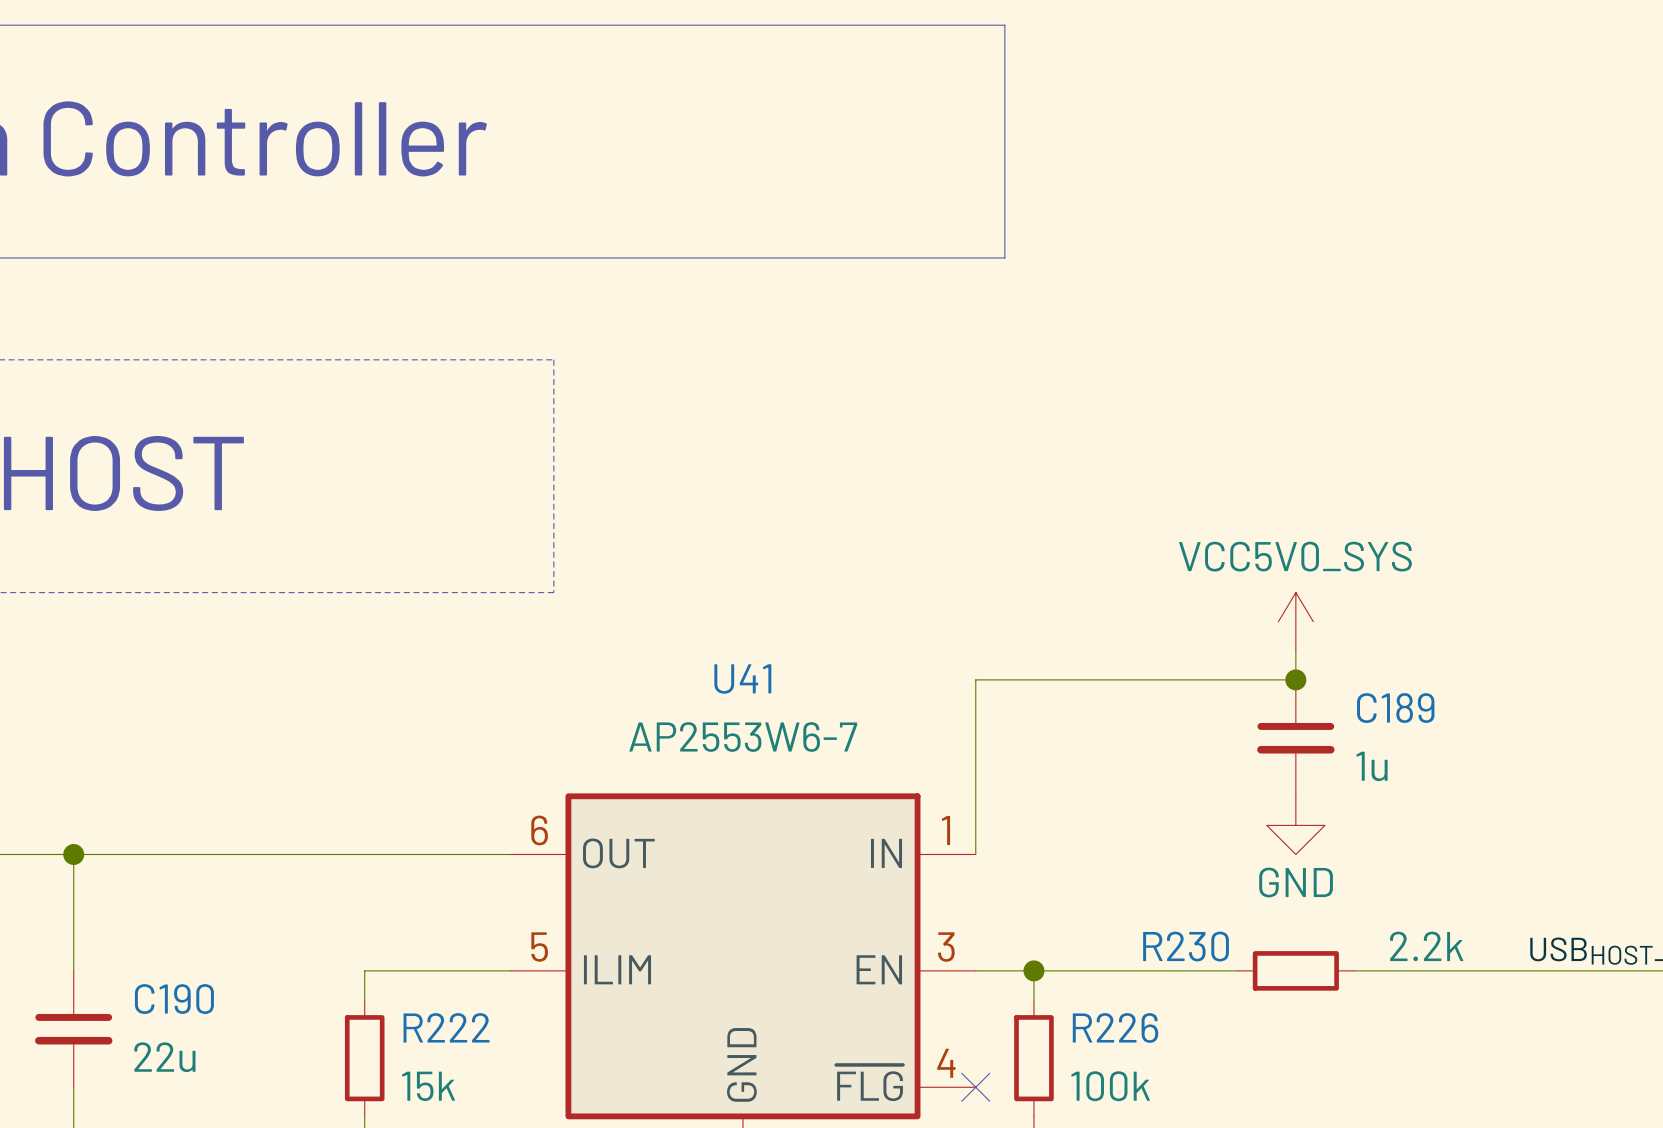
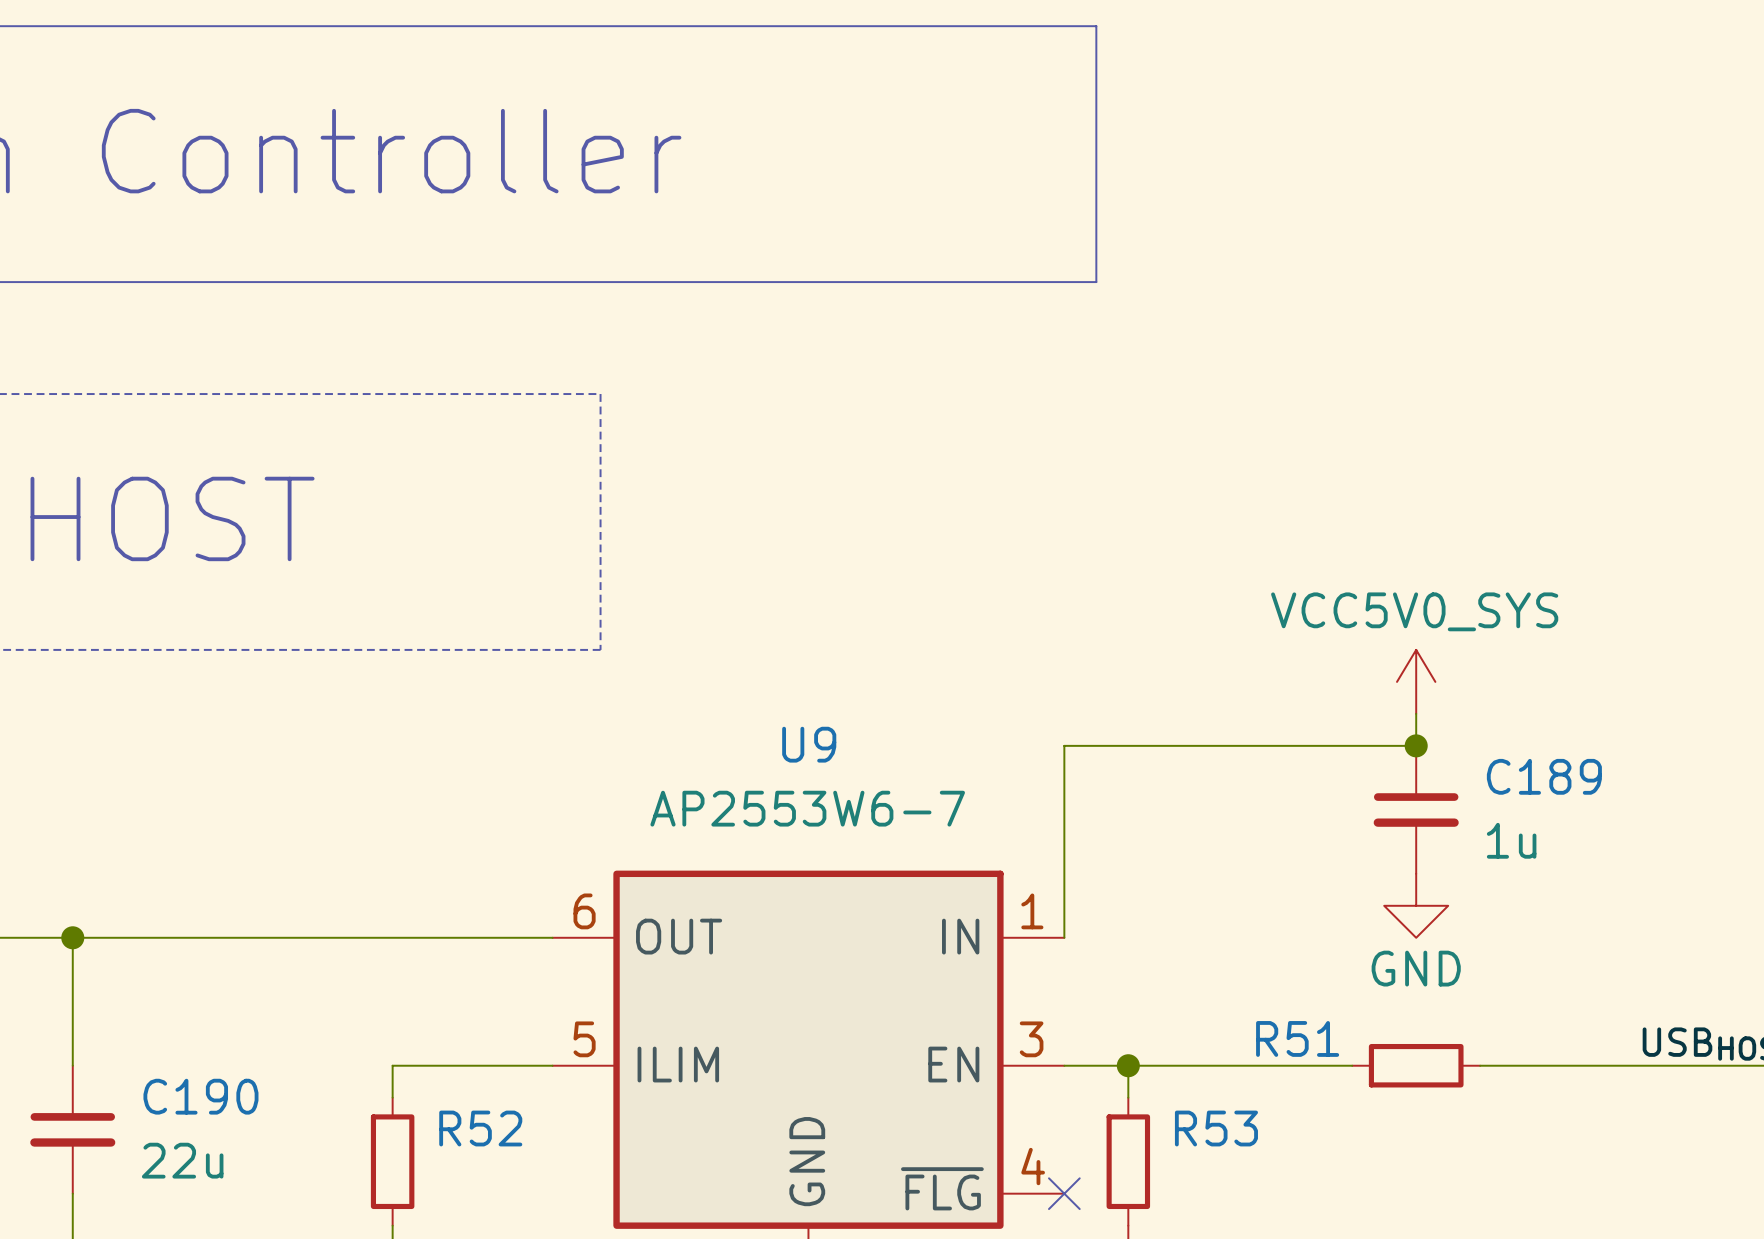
U41 name: U41 (742, 678) -> U9 (809, 744)
R230 name: R230 (1186, 946) -> R51 (1297, 1038)
R230 value: 2.2k (1426, 946) -> none
R222 name: R222 (446, 1027) -> R52 (480, 1128)
R226 name: R226 (1115, 1027) -> R53 (1216, 1128)
R222 value: 15k (428, 1086) -> none
R226 value: 100k (1110, 1086) -> none

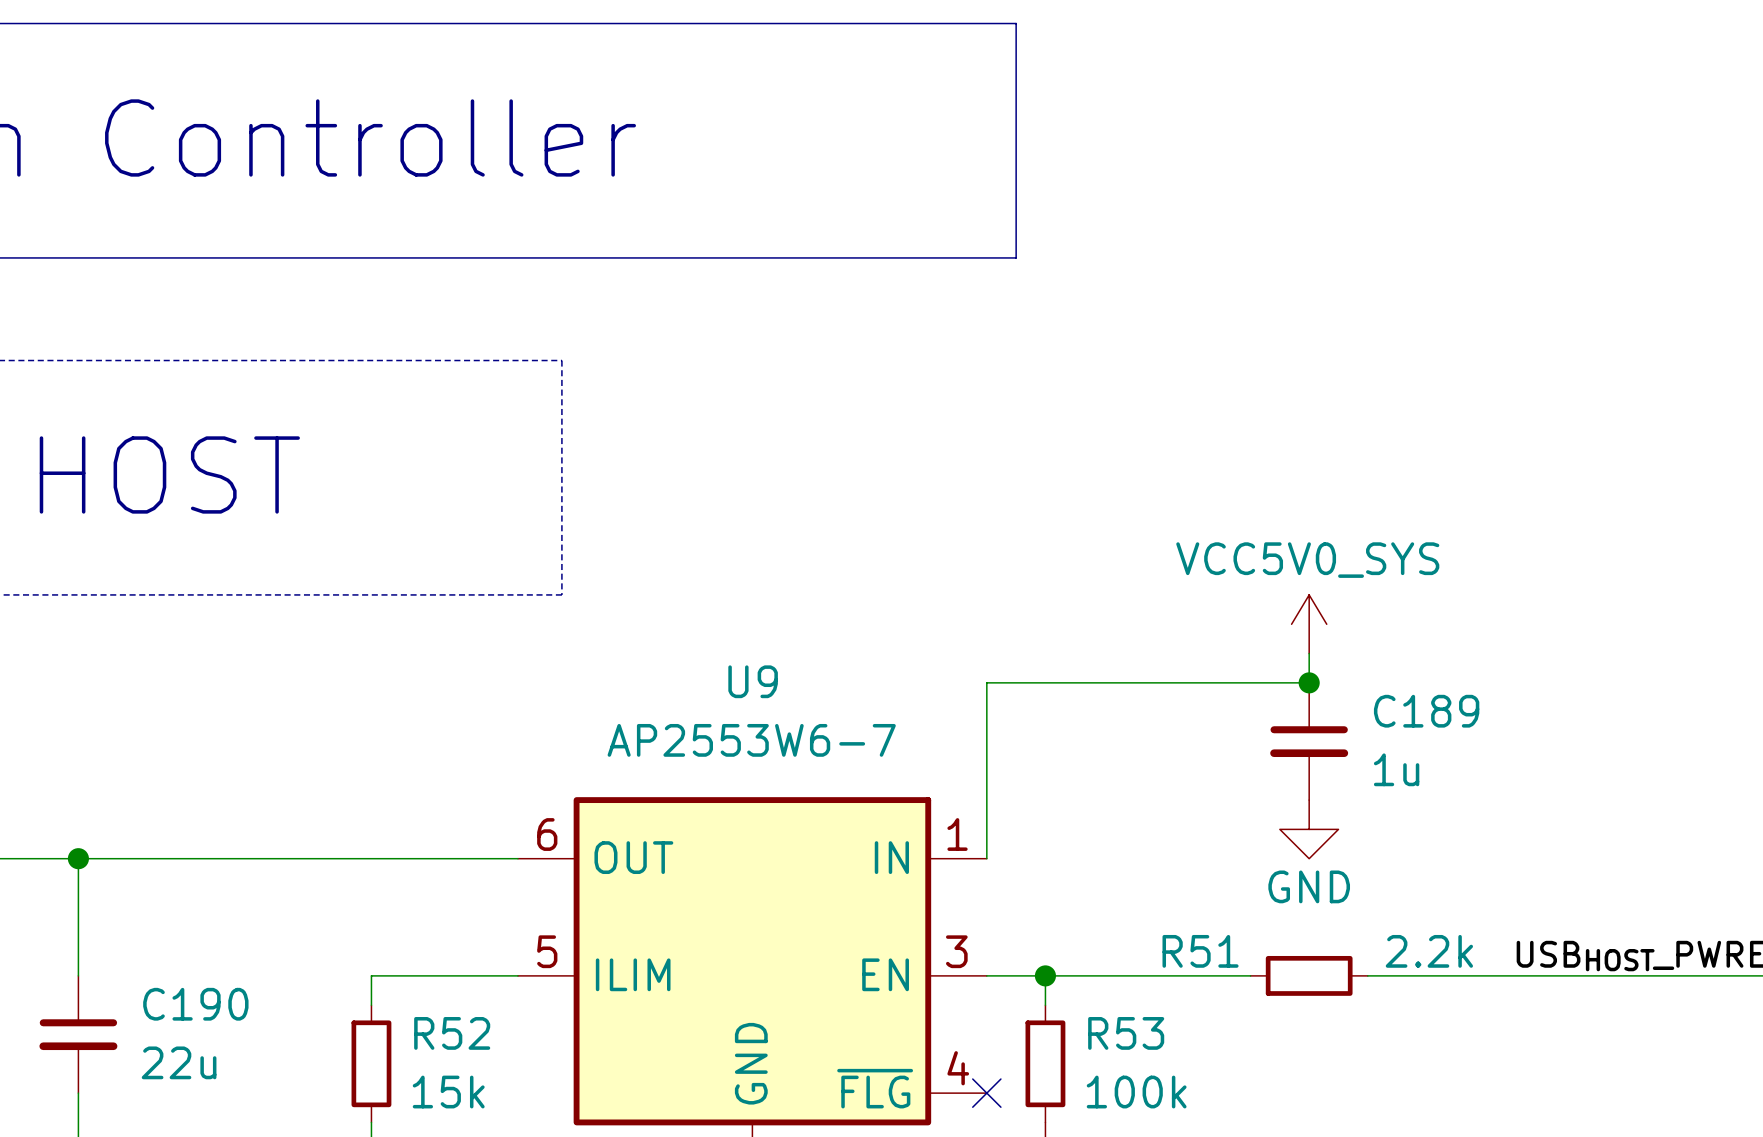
R51 value: none -> 2.2k (1429, 951)
R52 value: none -> 15k (448, 1092)
R53 value: none -> 100k (1136, 1092)

